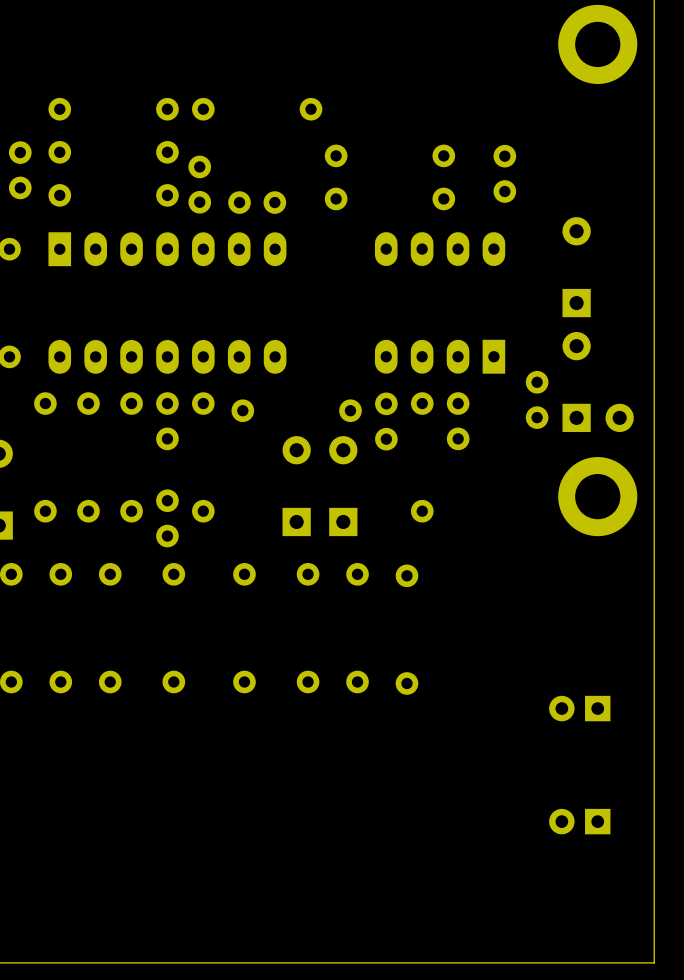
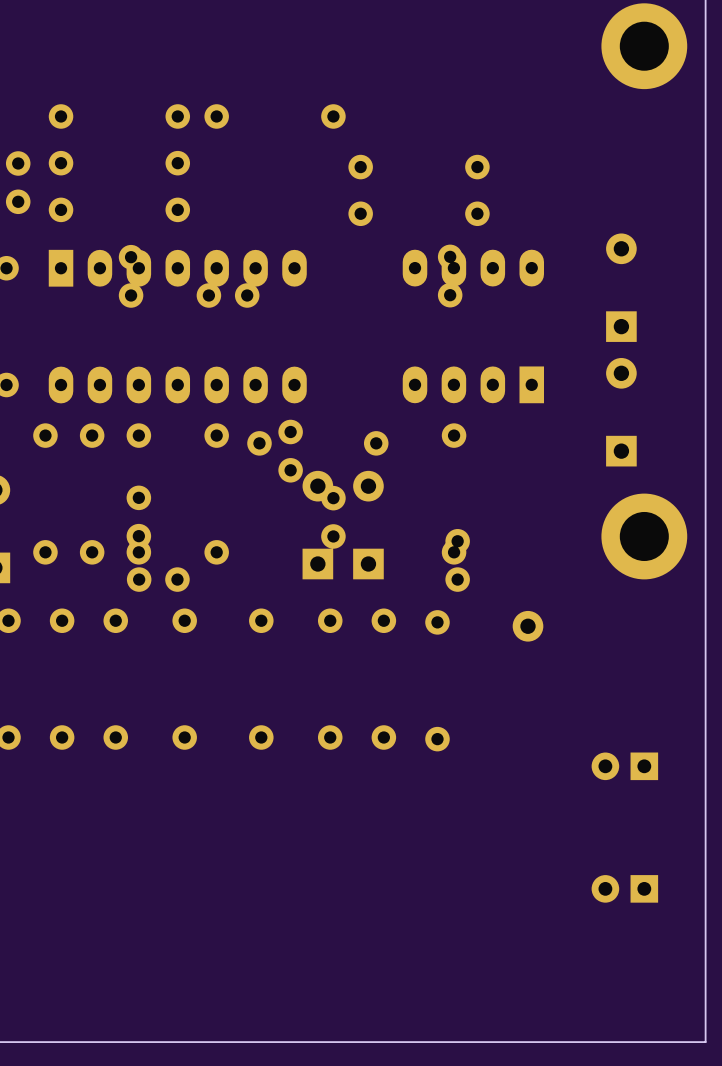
part: (504, 173) -> none
part: (199, 184) -> none
part: (257, 202) -> none
part: none -> (131, 276)
part: none -> (450, 276)
part: none -> (228, 295)
part: (537, 399) -> none
part: none -> (290, 451)
part position: (619, 417) -> (528, 626)
part: (167, 421) -> none
part: (386, 421) -> none
part: (458, 421) -> none
part: none -> (138, 517)
part: none -> (333, 517)
part rotation: 0° (167, 518) -> 90° clockwise (158, 579)
part: none -> (457, 560)

